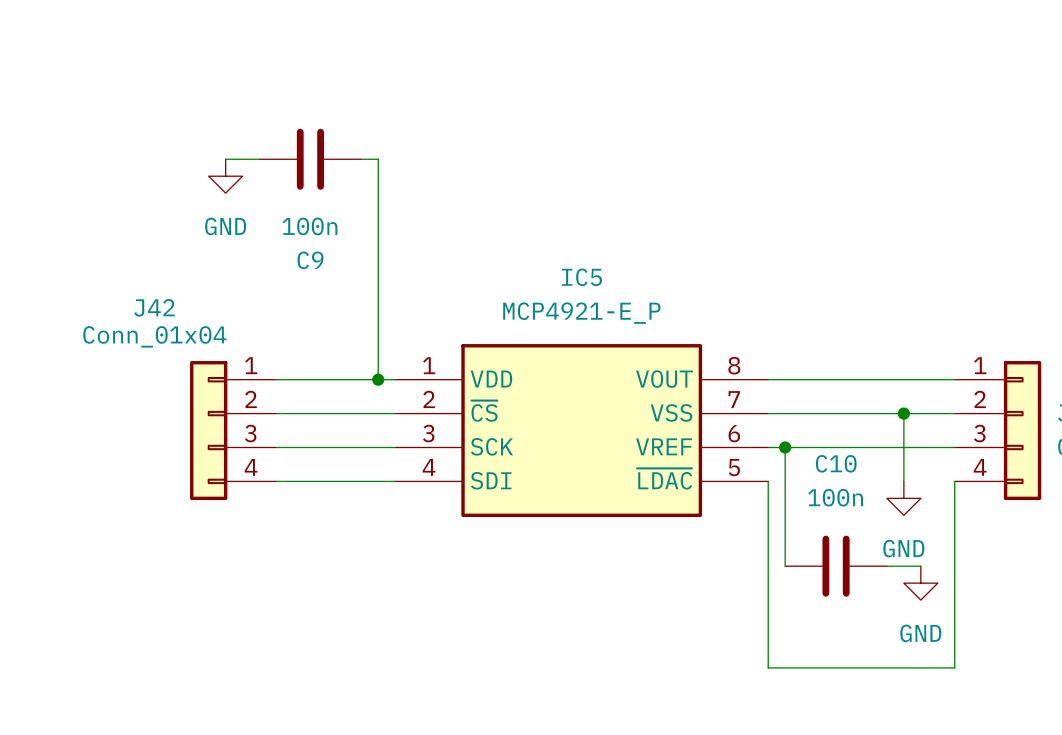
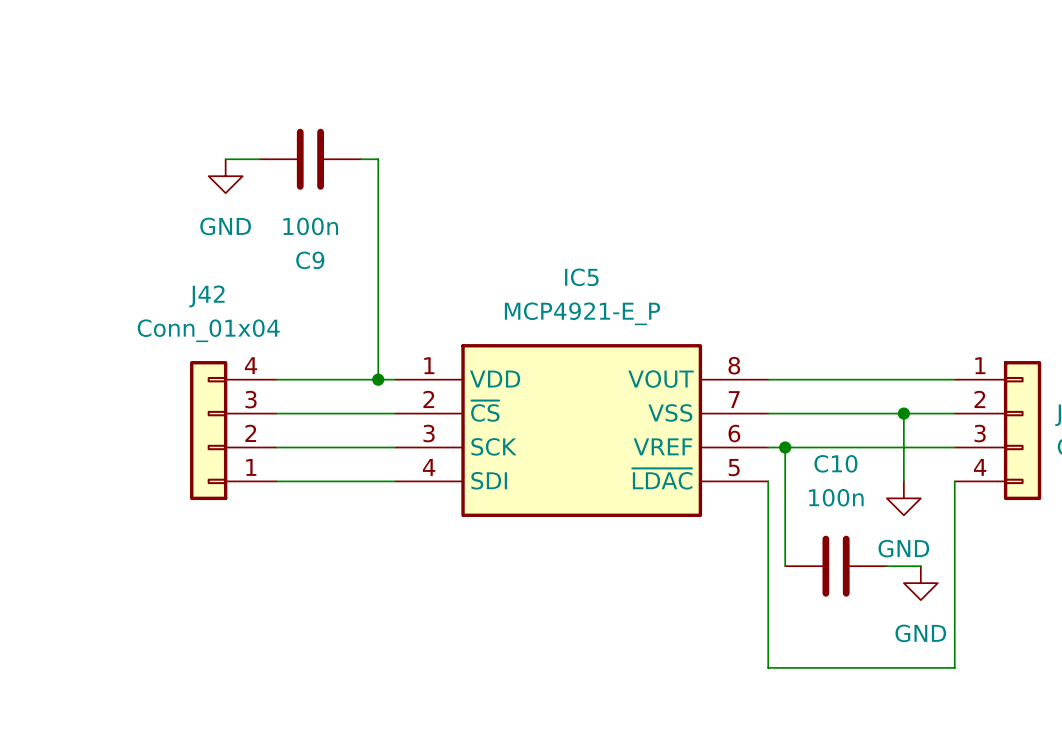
J42 name position: J42 (154, 307) -> J42 (206, 296)
J42 value position: Conn_01x04 (154, 336) -> Conn_01x04 (208, 330)
J42 flip: as is (208, 430) -> up-down (208, 430)

